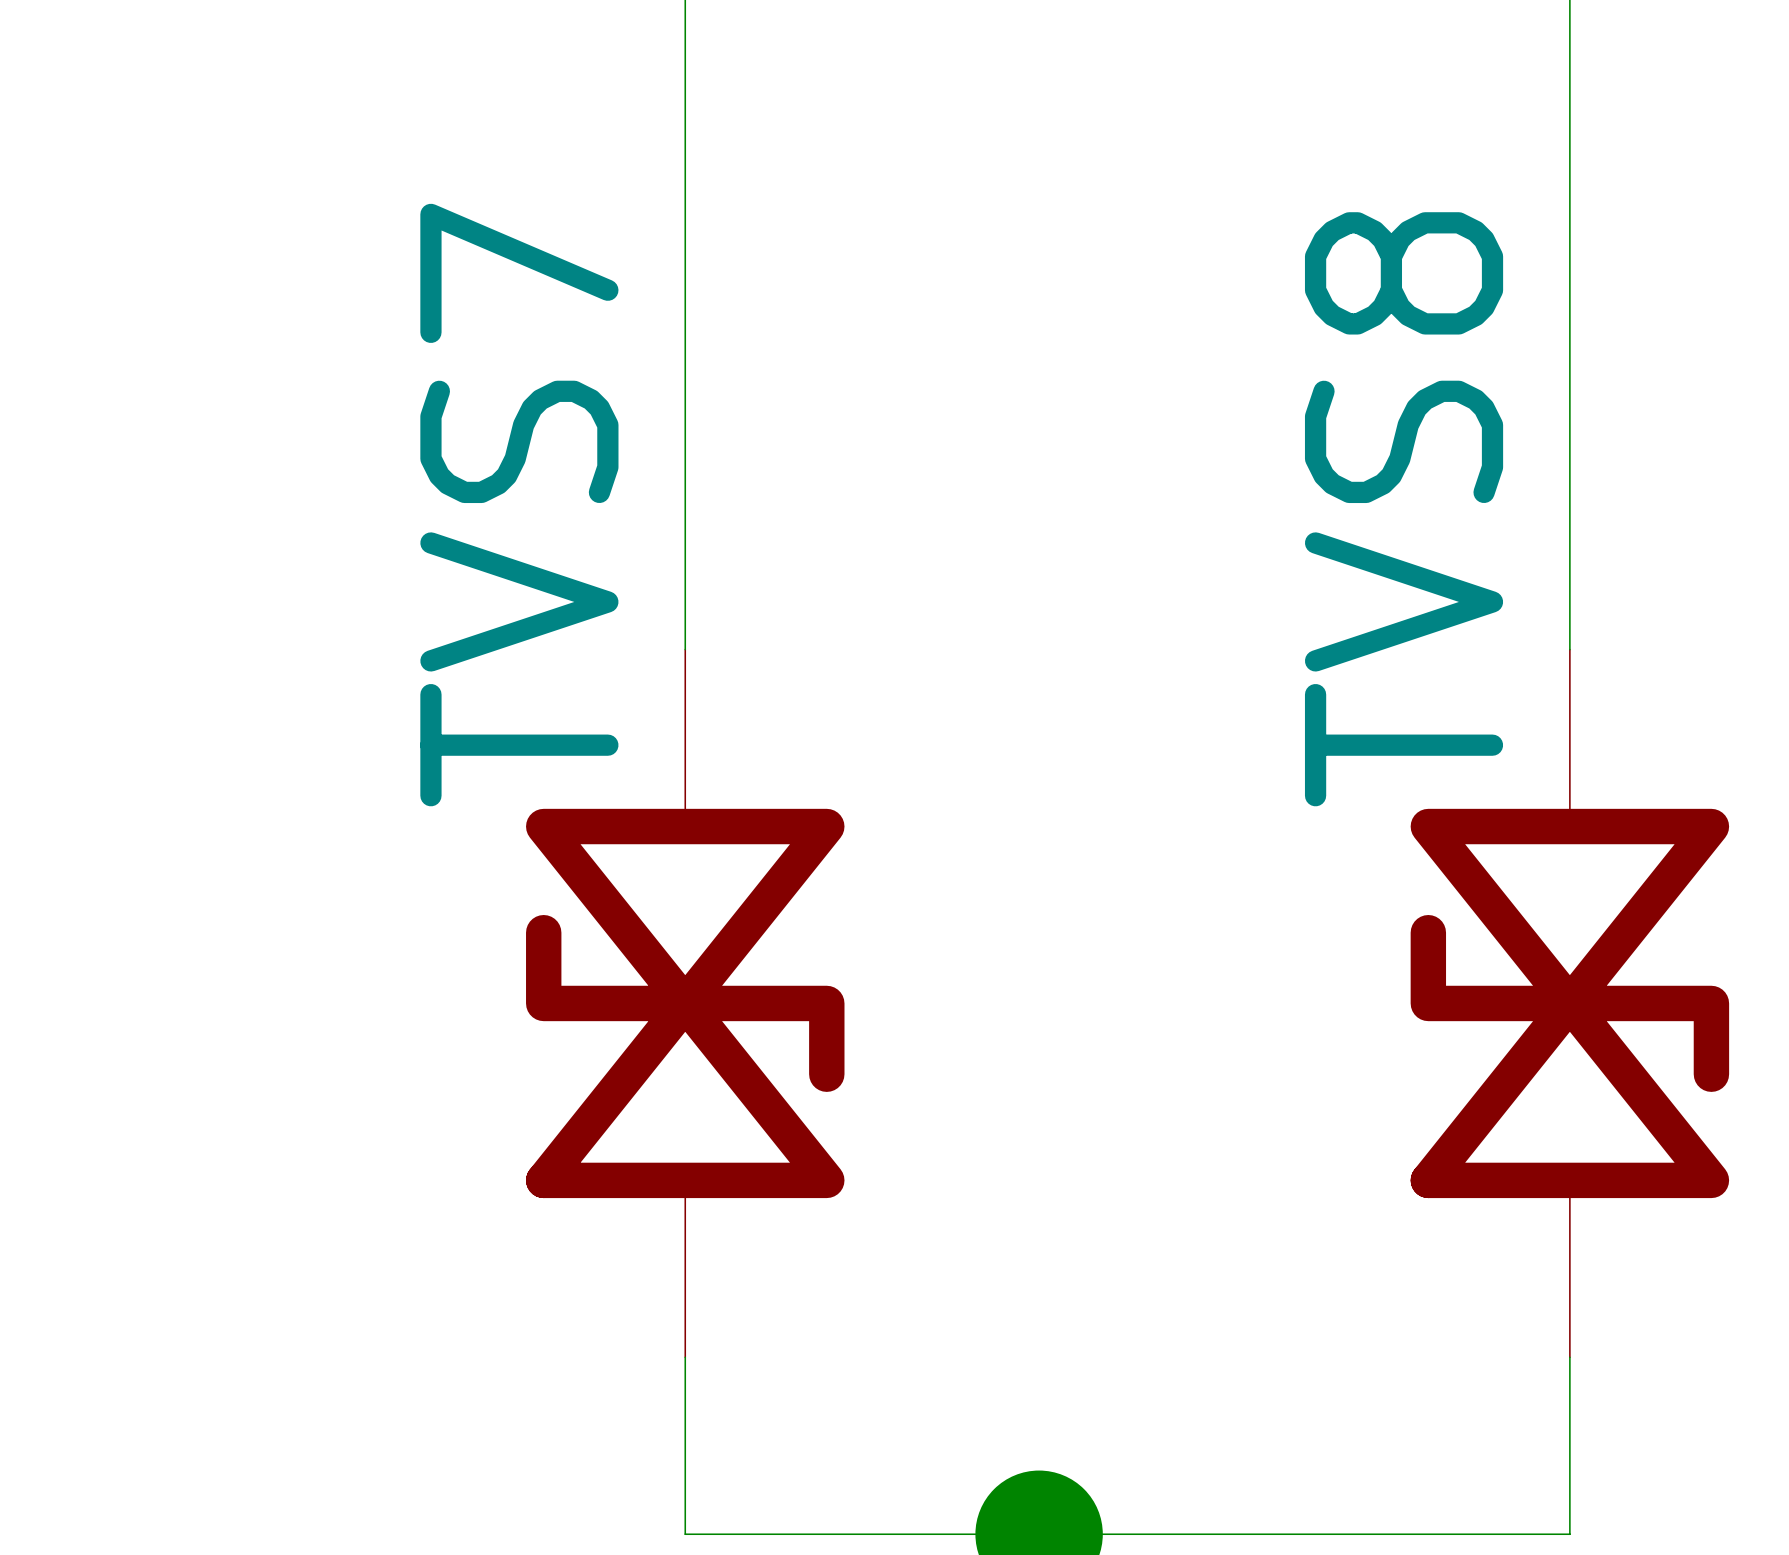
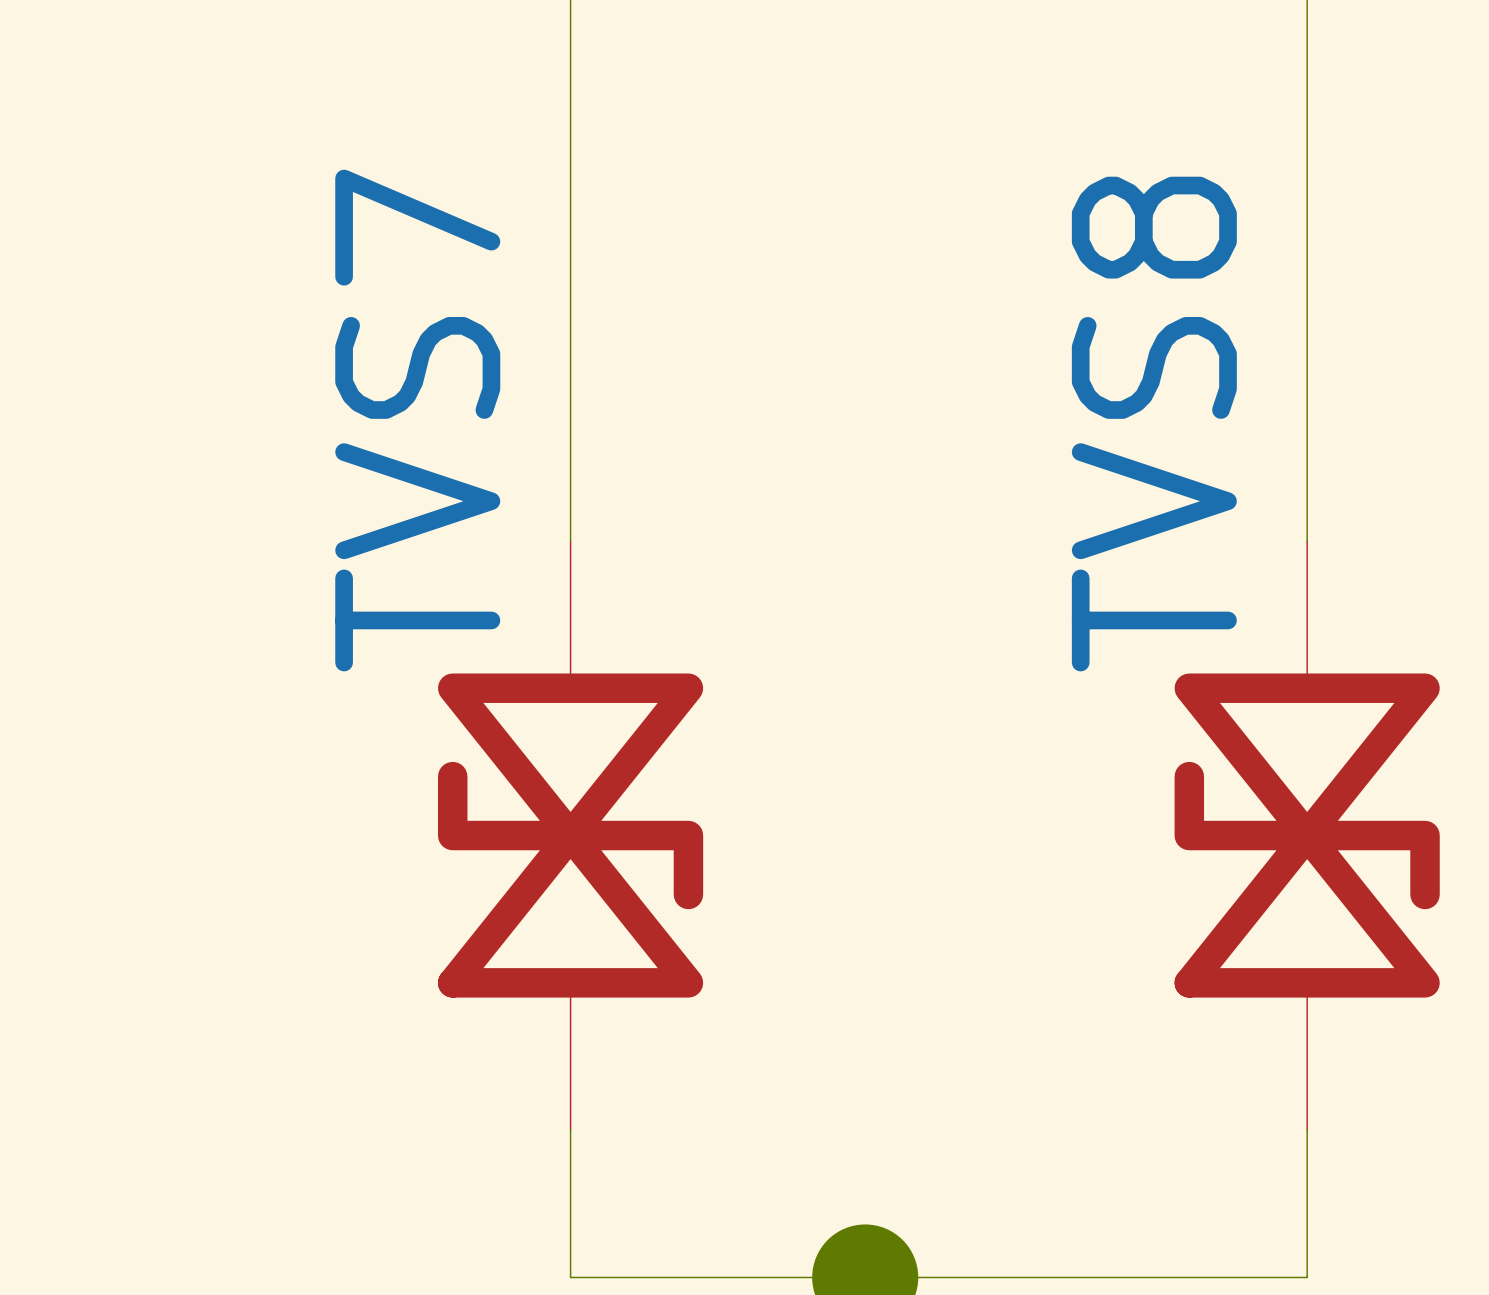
TVS7 name position: TVS7 (519, 505) -> TVS7 (417, 420)
TVS8 name position: TVS8 (1404, 509) -> TVS8 (1154, 424)

